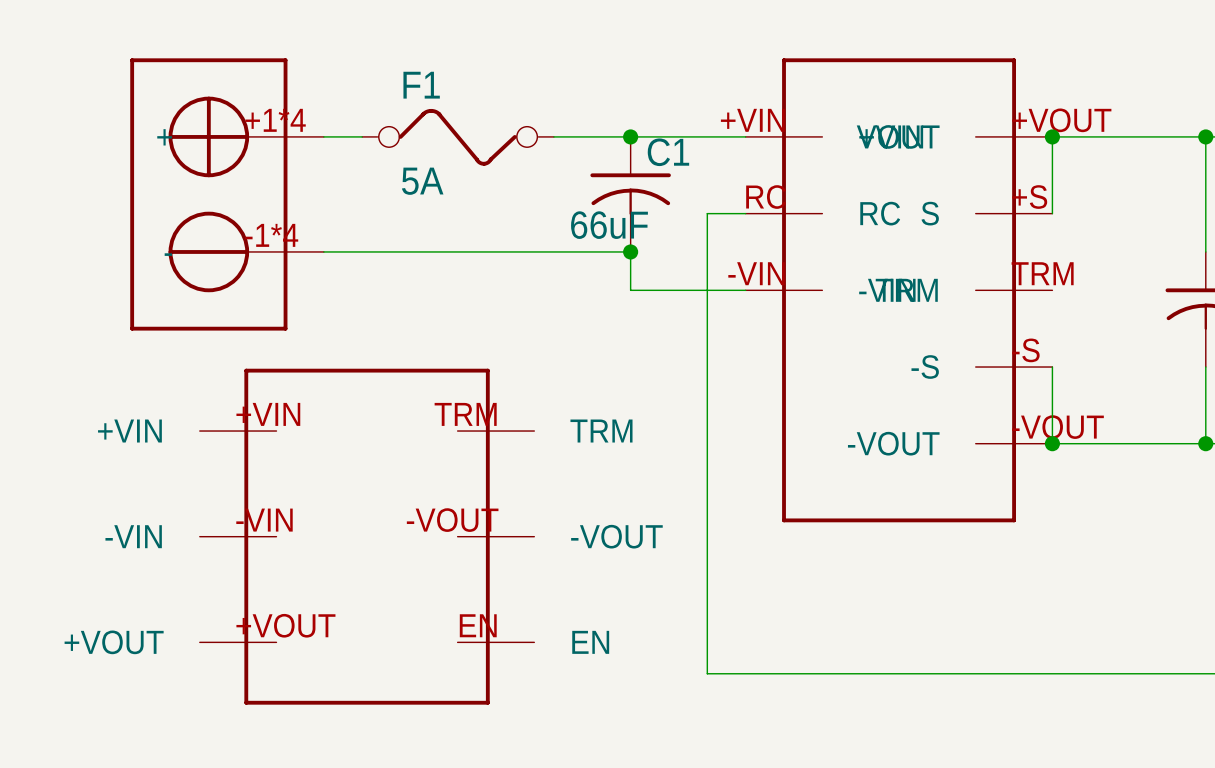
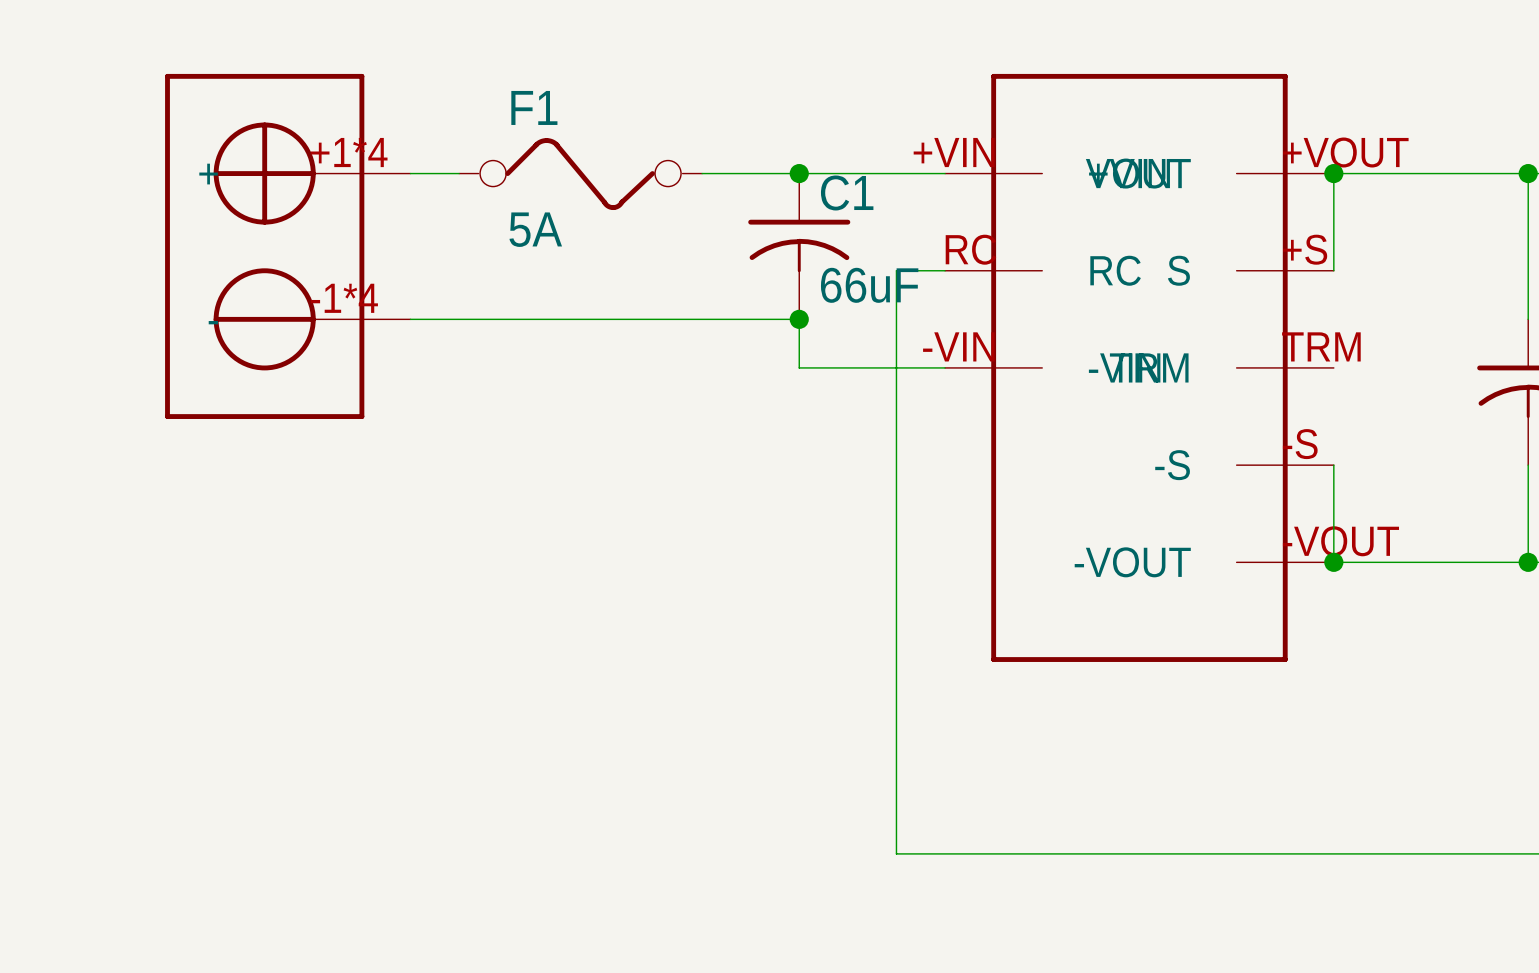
C1 value position: 66uF (609, 225) -> 66uF (869, 285)
part: (367, 536) -> none

